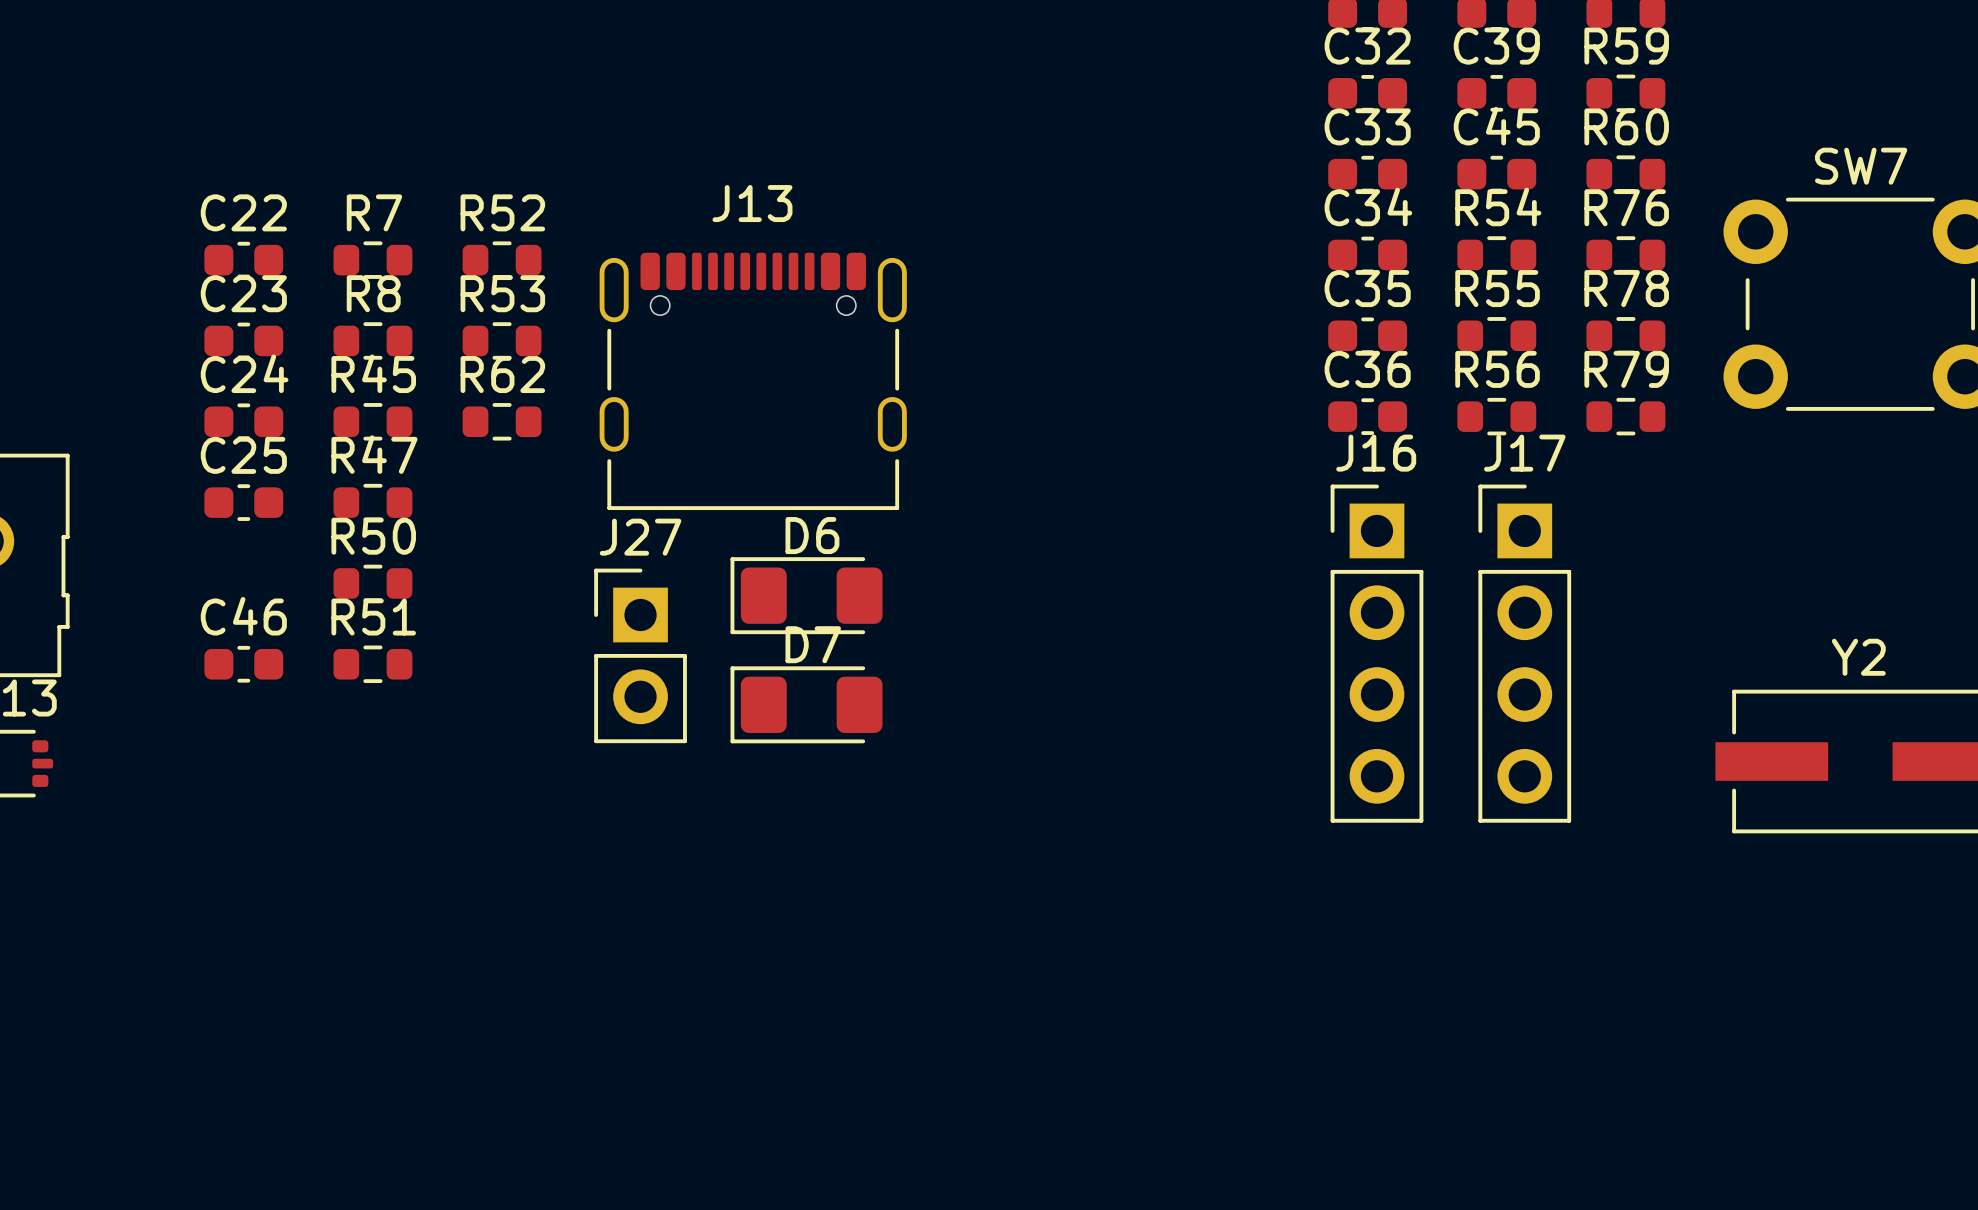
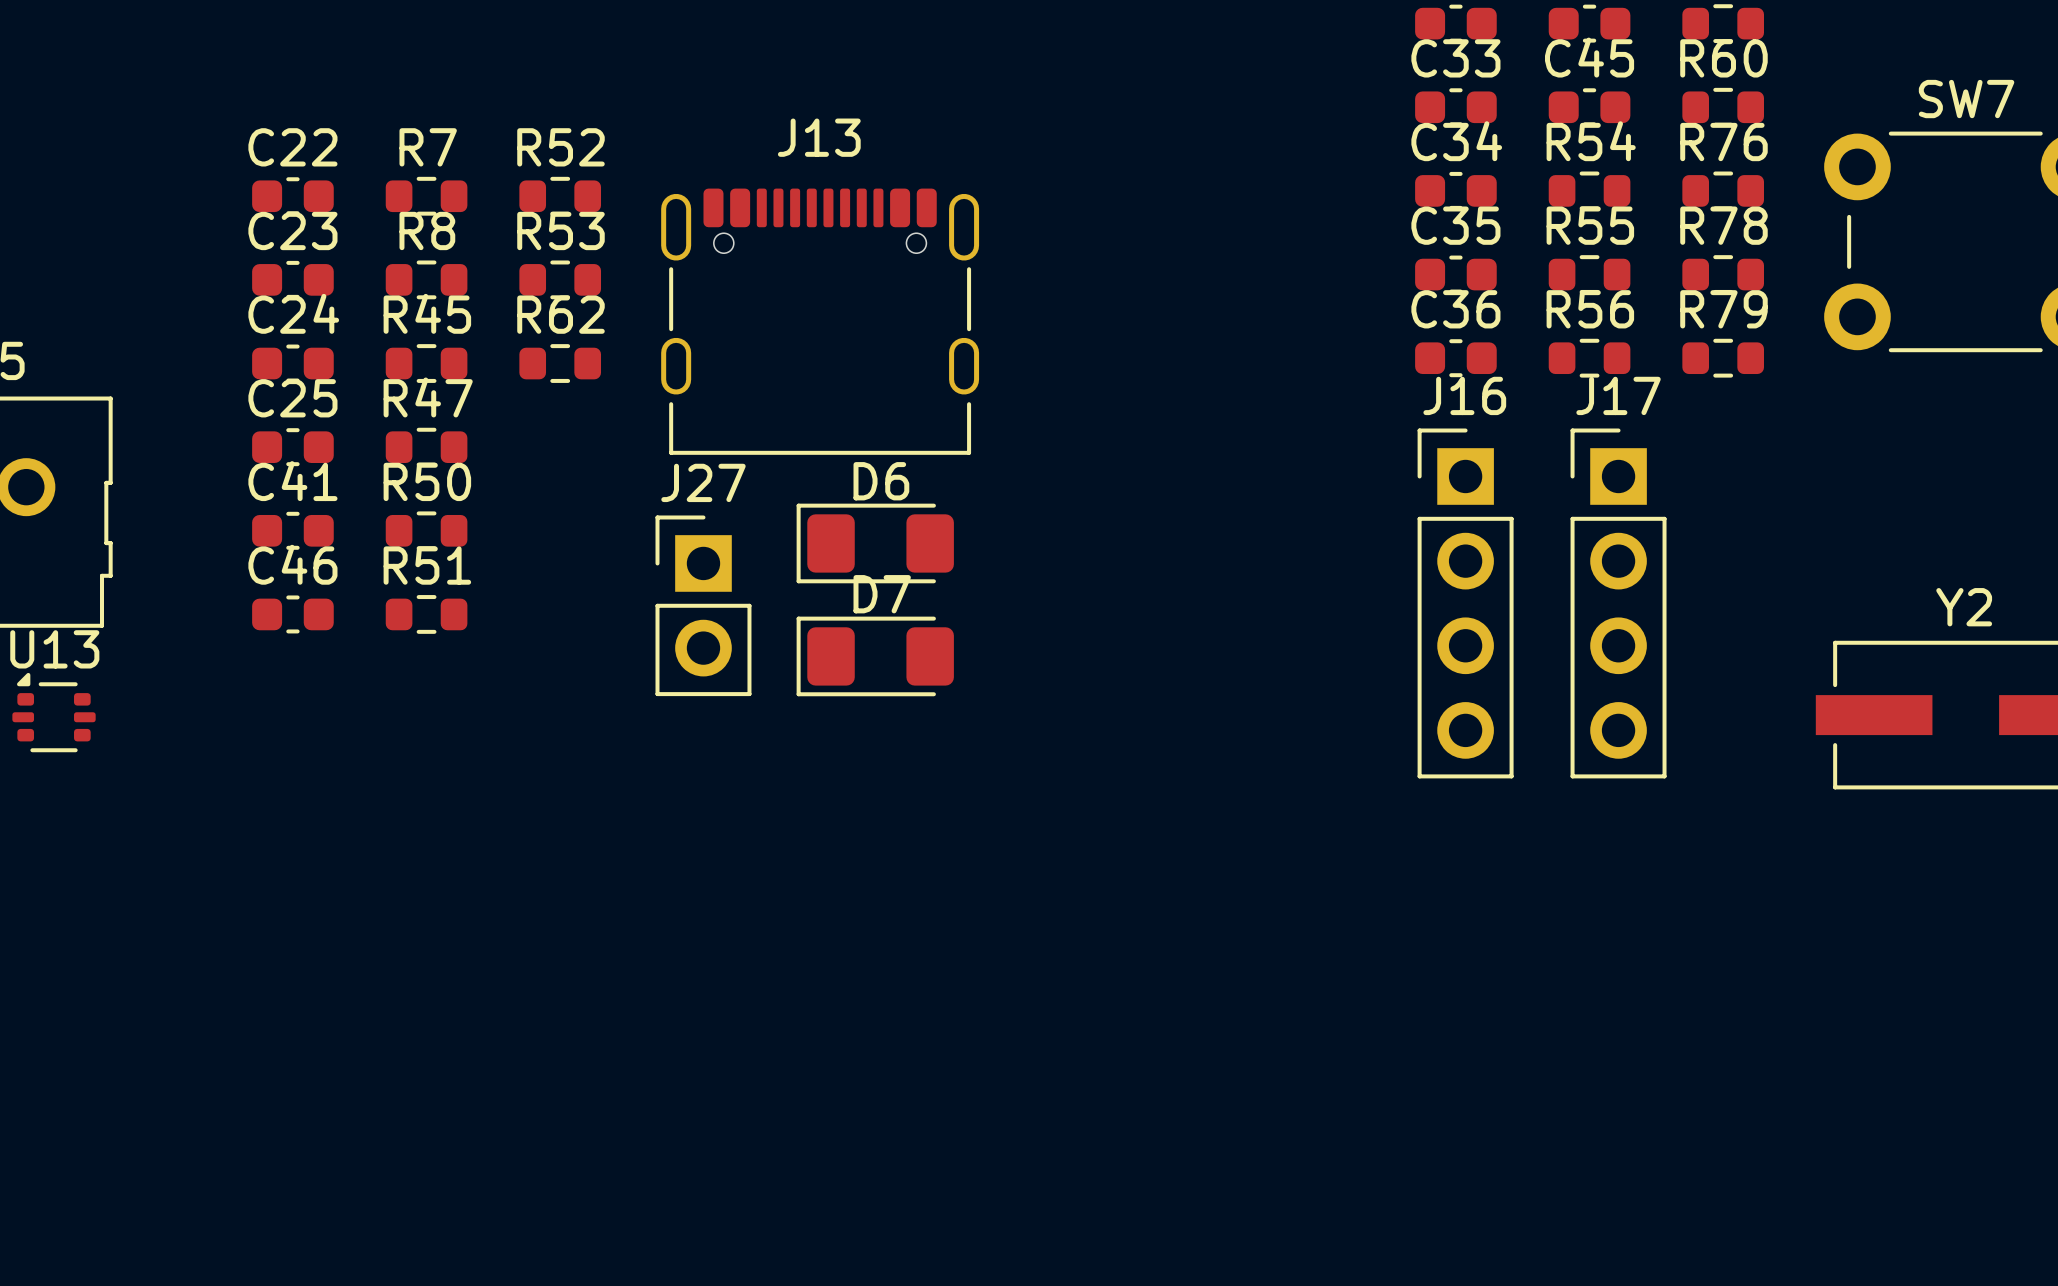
C41: none -> (292, 530)

